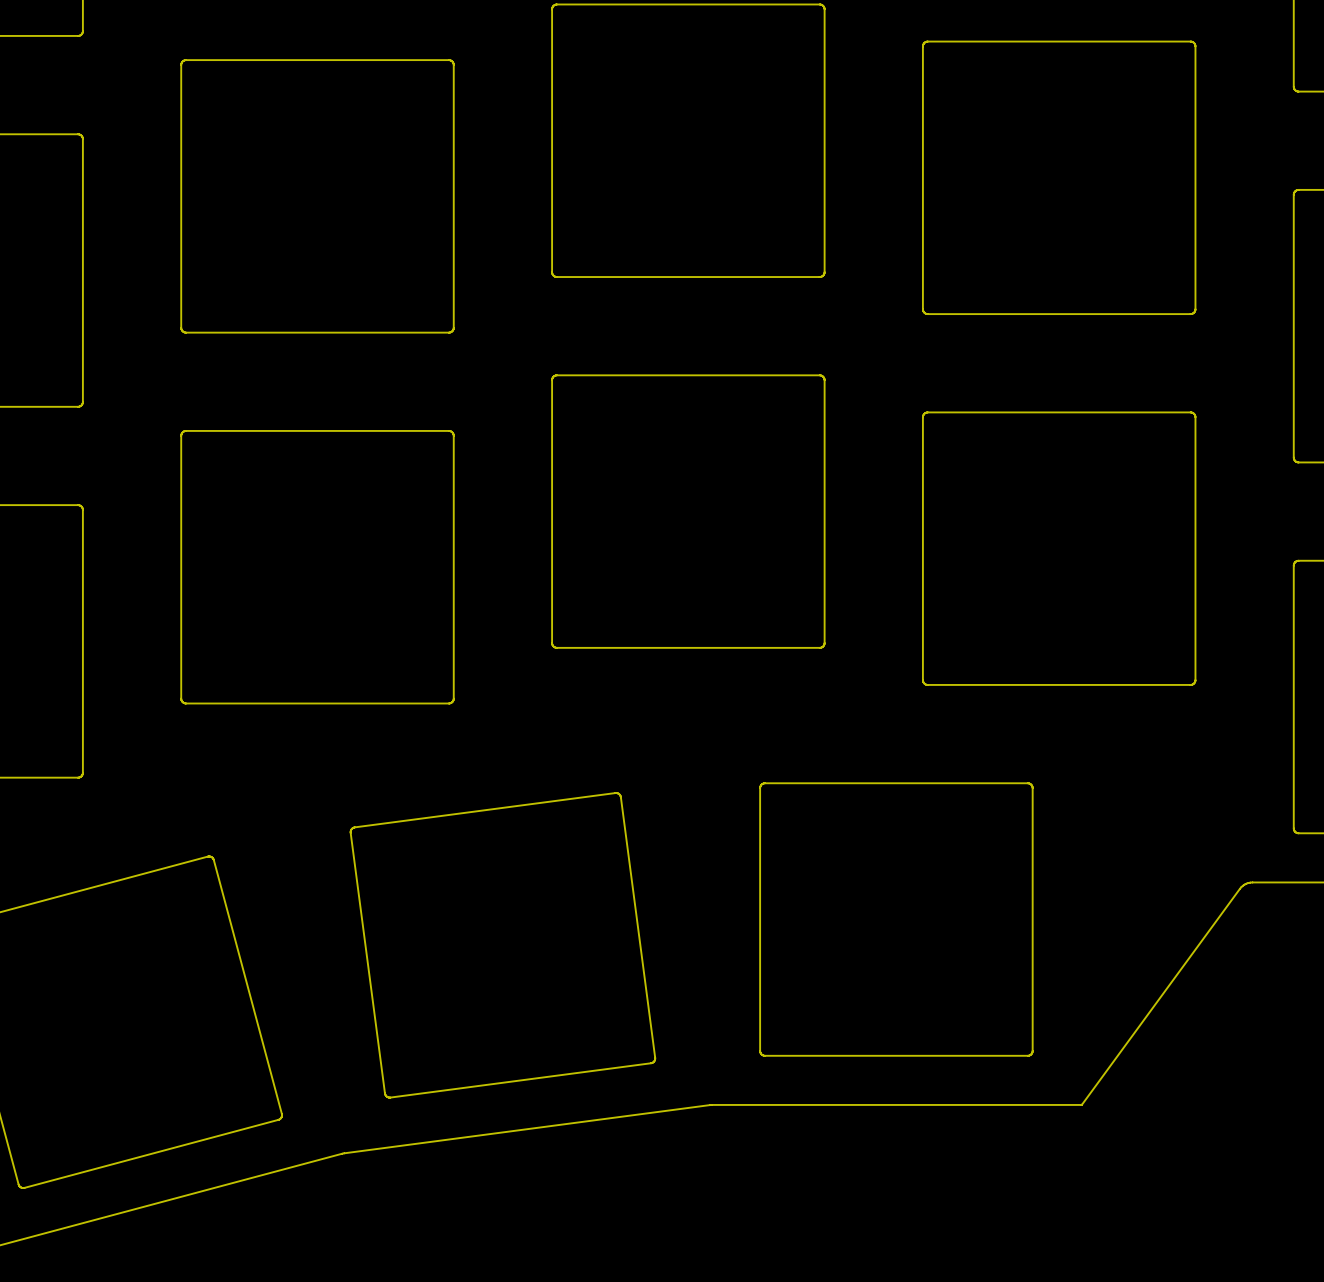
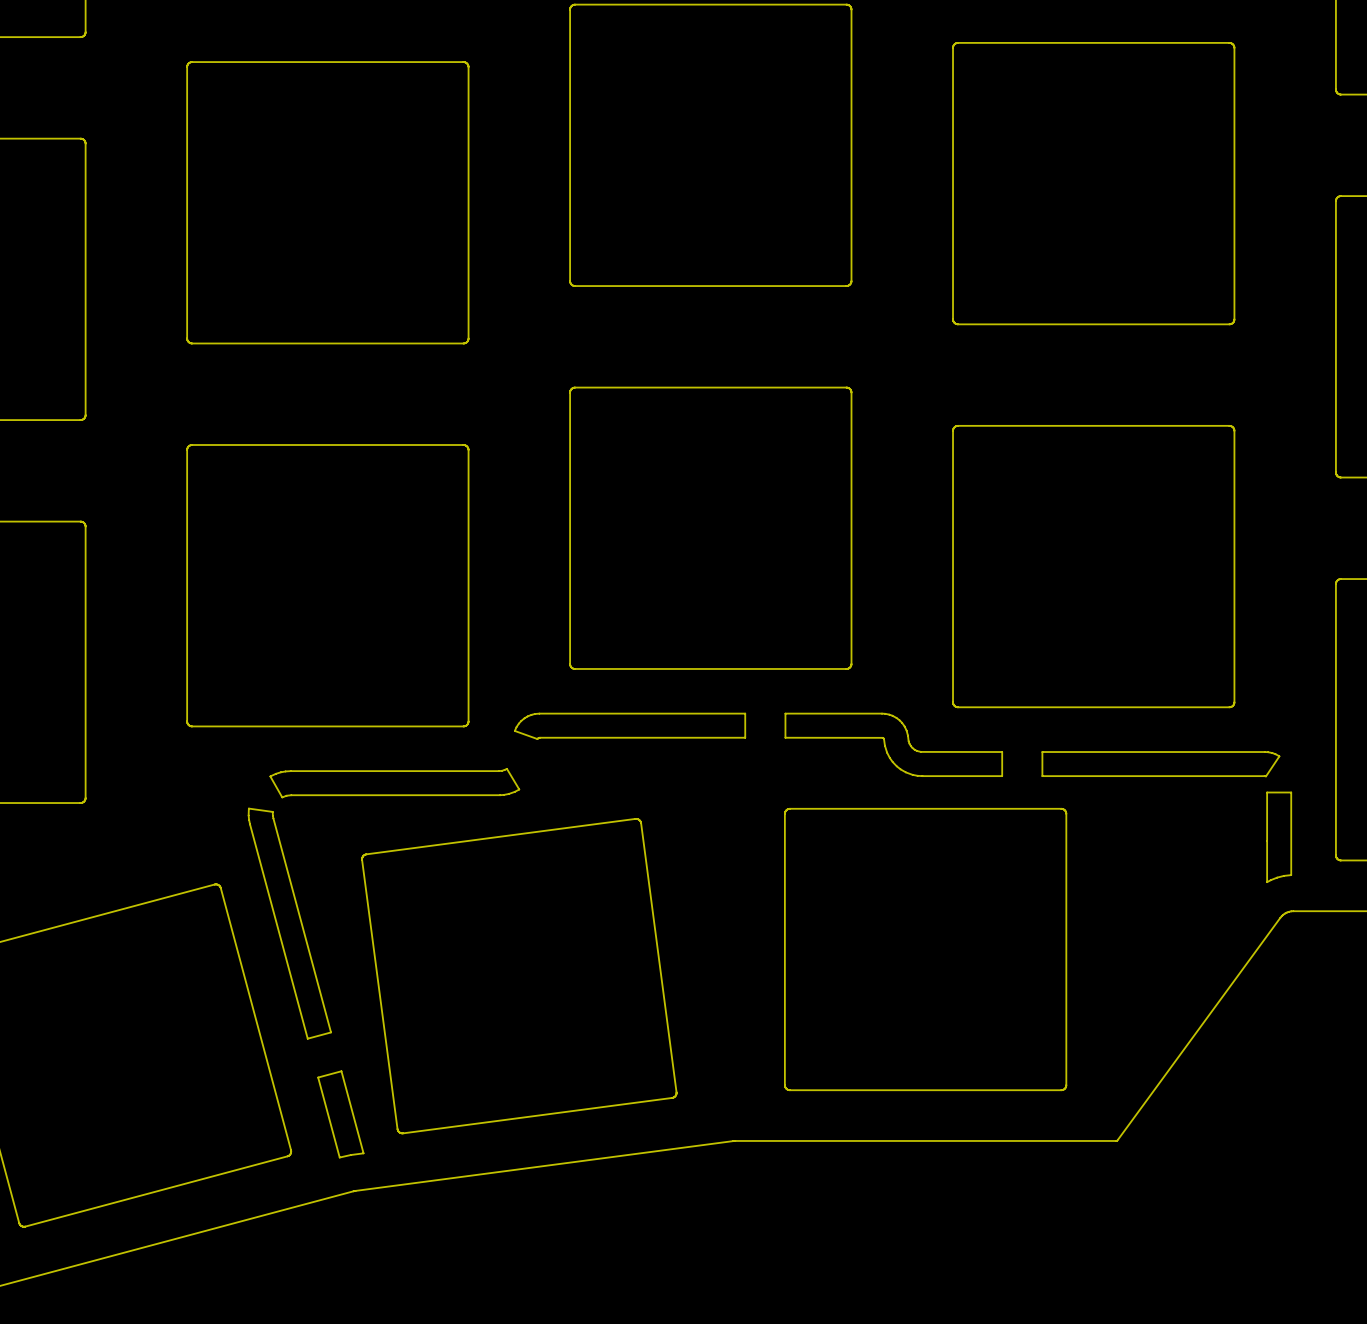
board edge: none -> (745, 713) (539, 713) (524, 718) (514, 730) (537, 739) (745, 737) (745, 713)
board edge: none -> (882, 713) (892, 715) (902, 722) (906, 730) (909, 743) (917, 750) (1002, 752) (1002, 776) (912, 774) (900, 769) (892, 762) (887, 752) (882, 737) (785, 737) (785, 713) (882, 713)
board edge: none -> (1265, 752) (1279, 756) (1266, 776) (1042, 776) (1042, 752) (1265, 752)
board edge: none -> (506, 768) (519, 789) (500, 795) (291, 795) (282, 797) (270, 776) (290, 771) (499, 771) (506, 768)
board edge: none -> (1291, 792) (1291, 875) (1277, 877) (1267, 882) (1267, 792) (1291, 792)
board edge: none -> (248, 808) (250, 824) (307, 1038) (331, 1032) (272, 811) (248, 808)
board edge: none -> (341, 1071) (363, 1153) (339, 1157) (318, 1077) (341, 1071)

